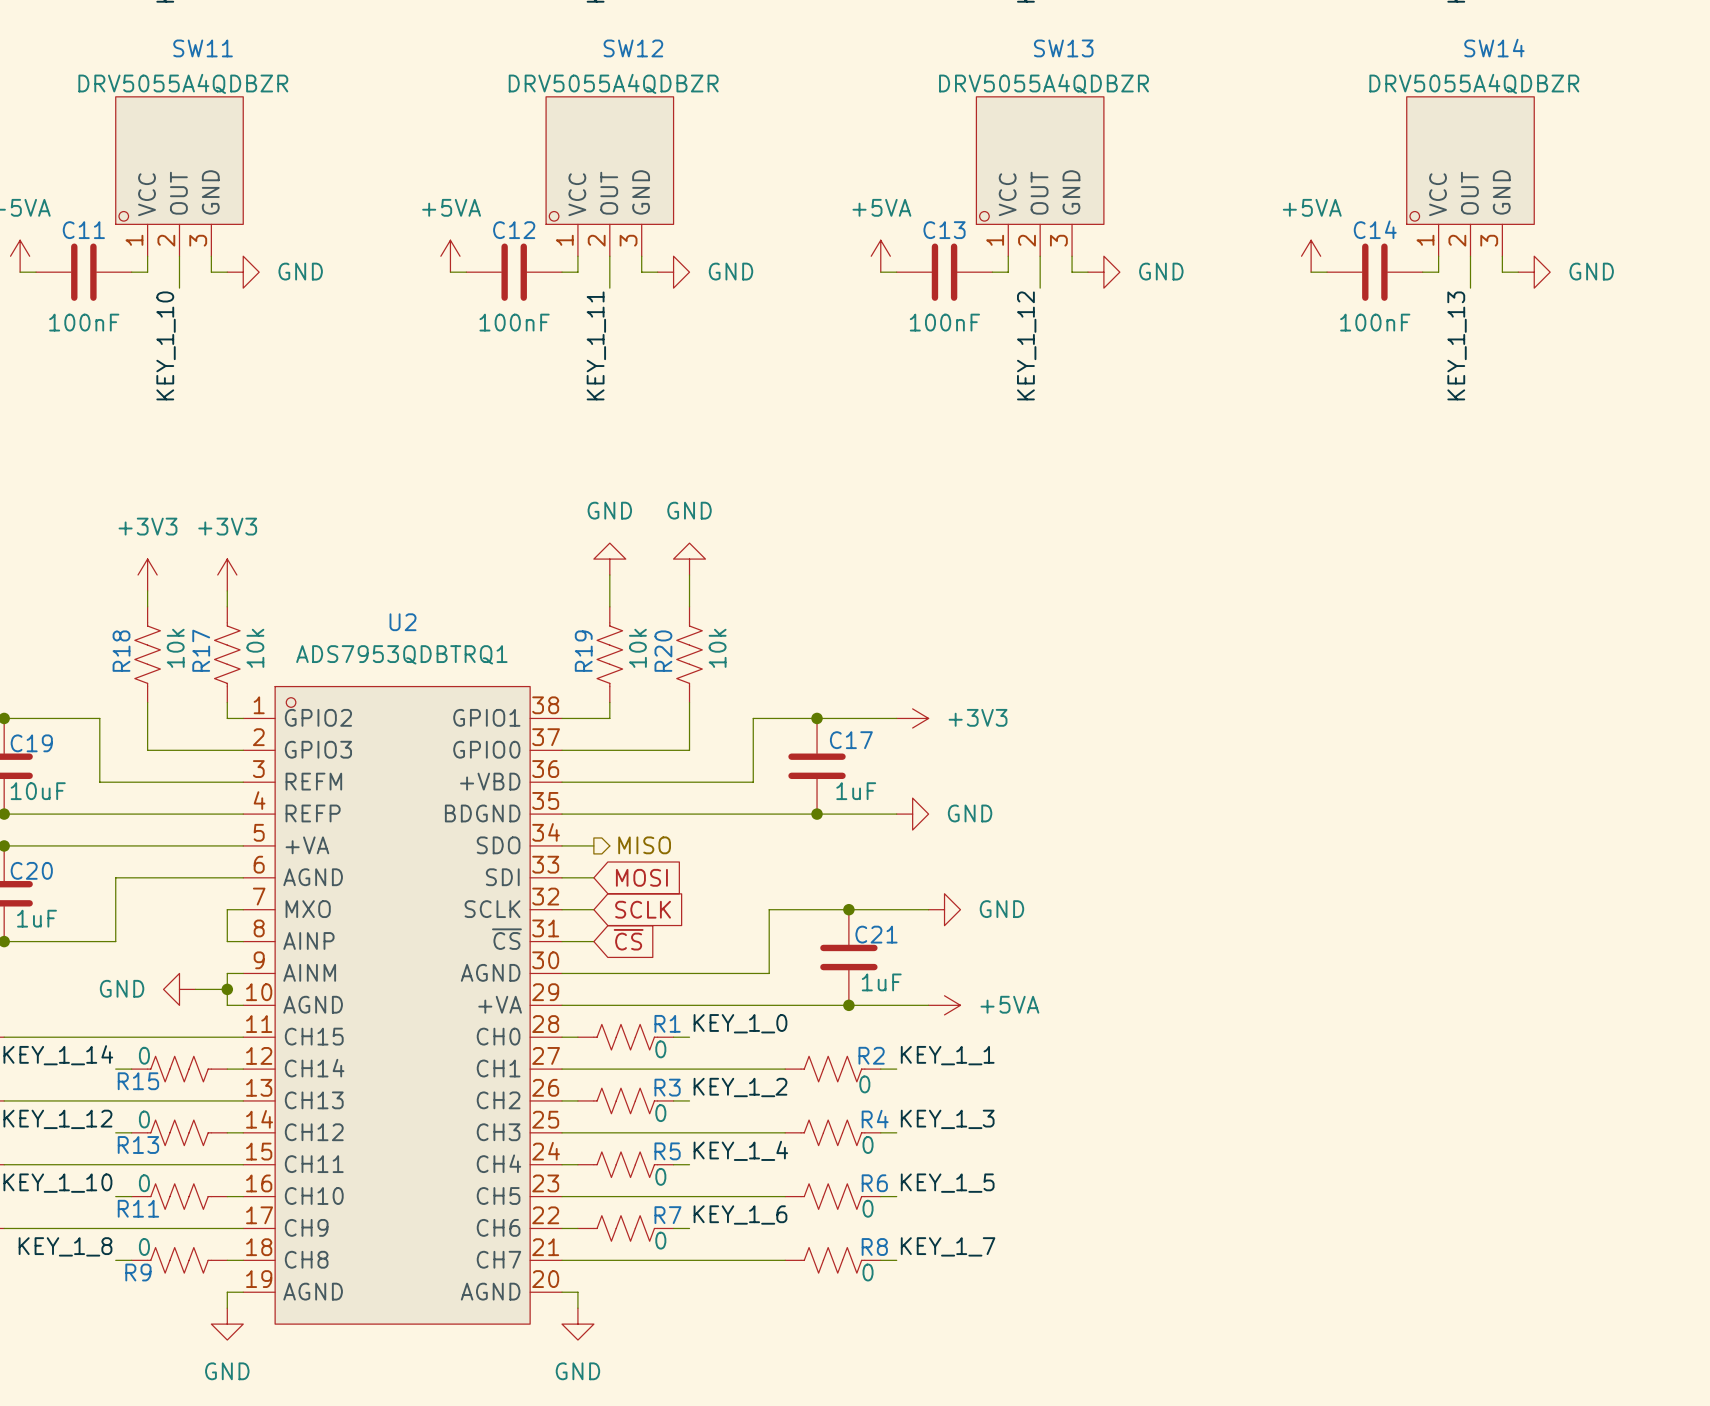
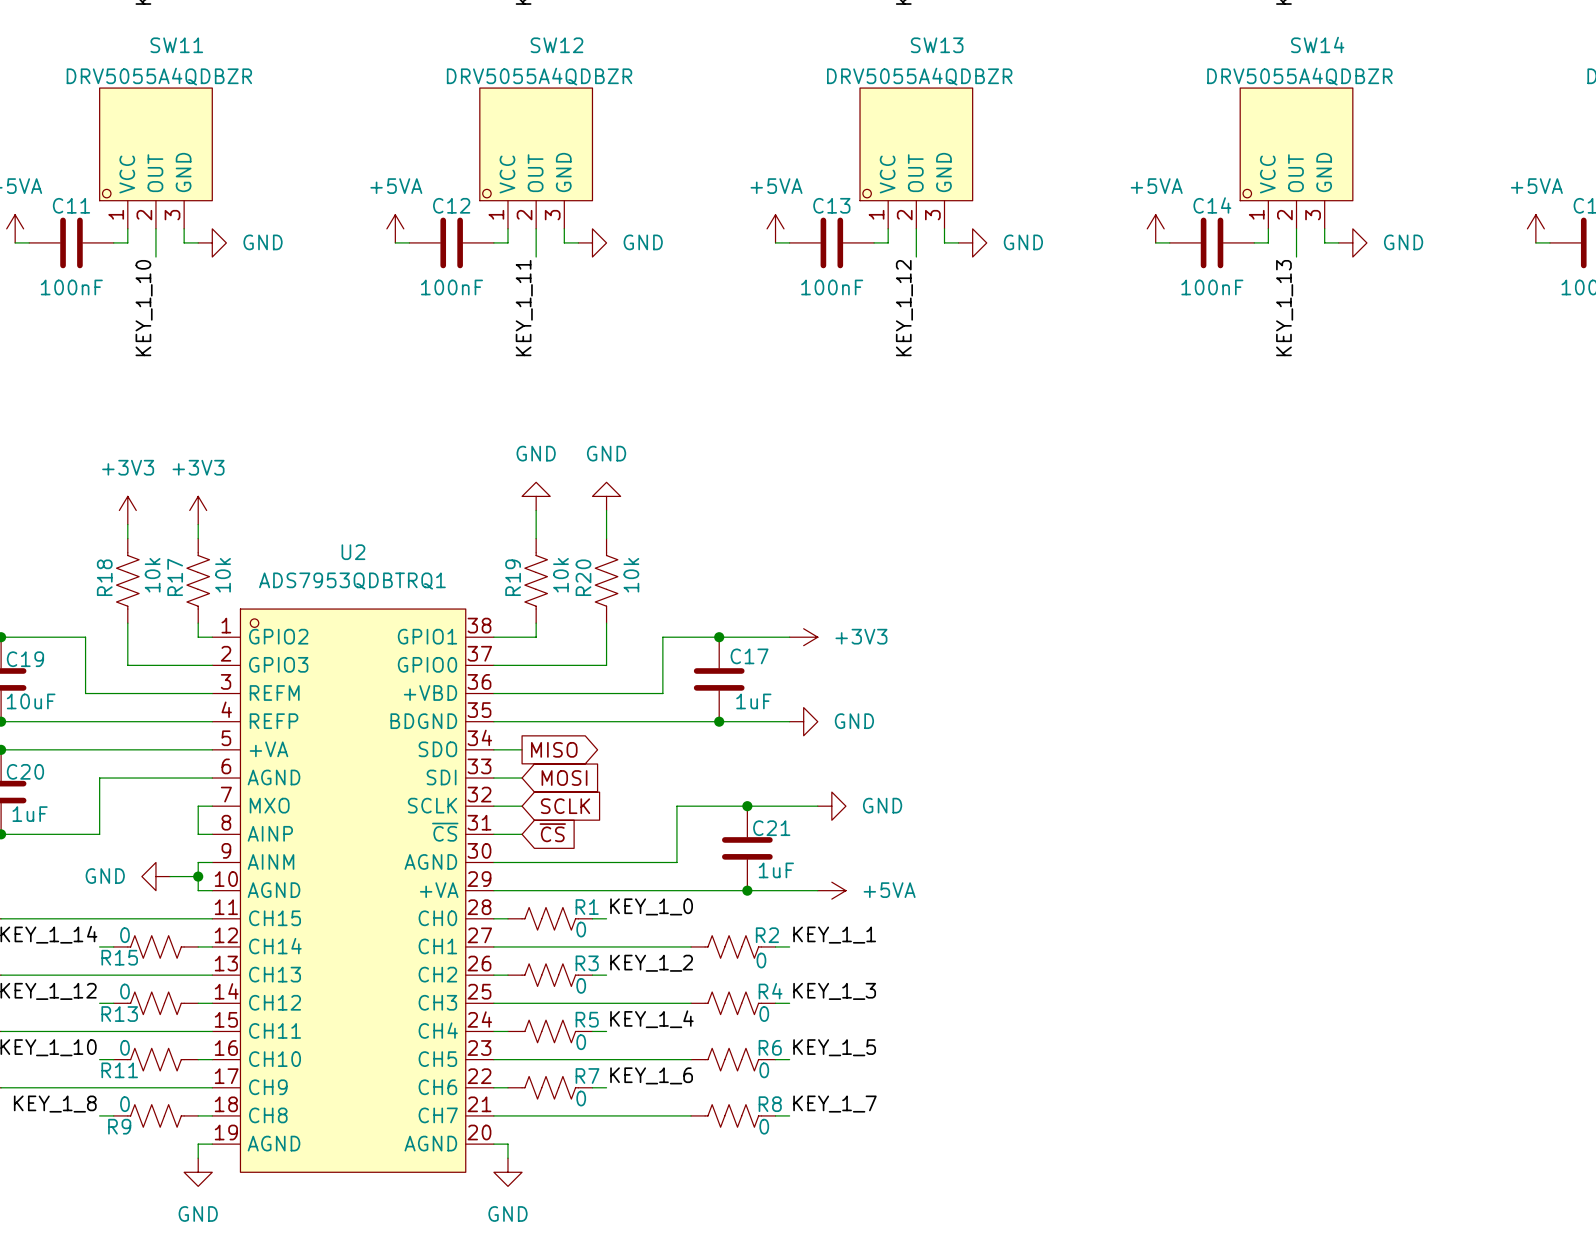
global label: none -> MISO (554, 749)
hierarchical label: MISO (644, 845) -> none

